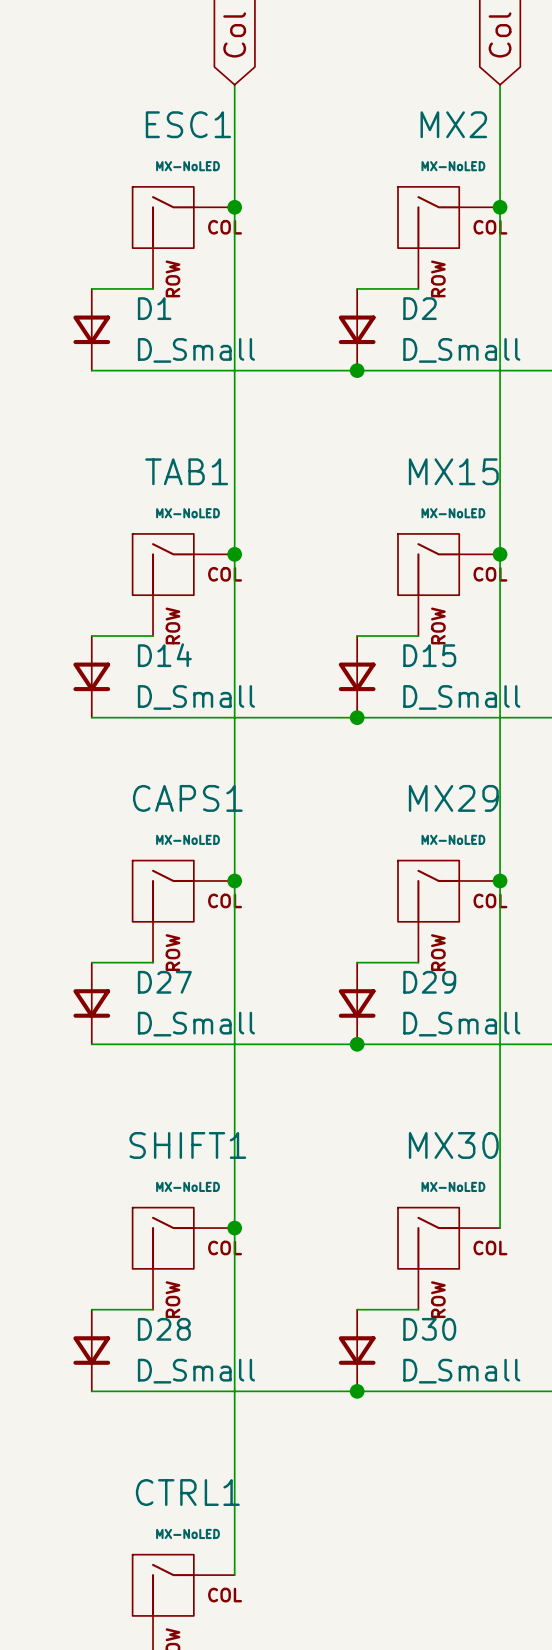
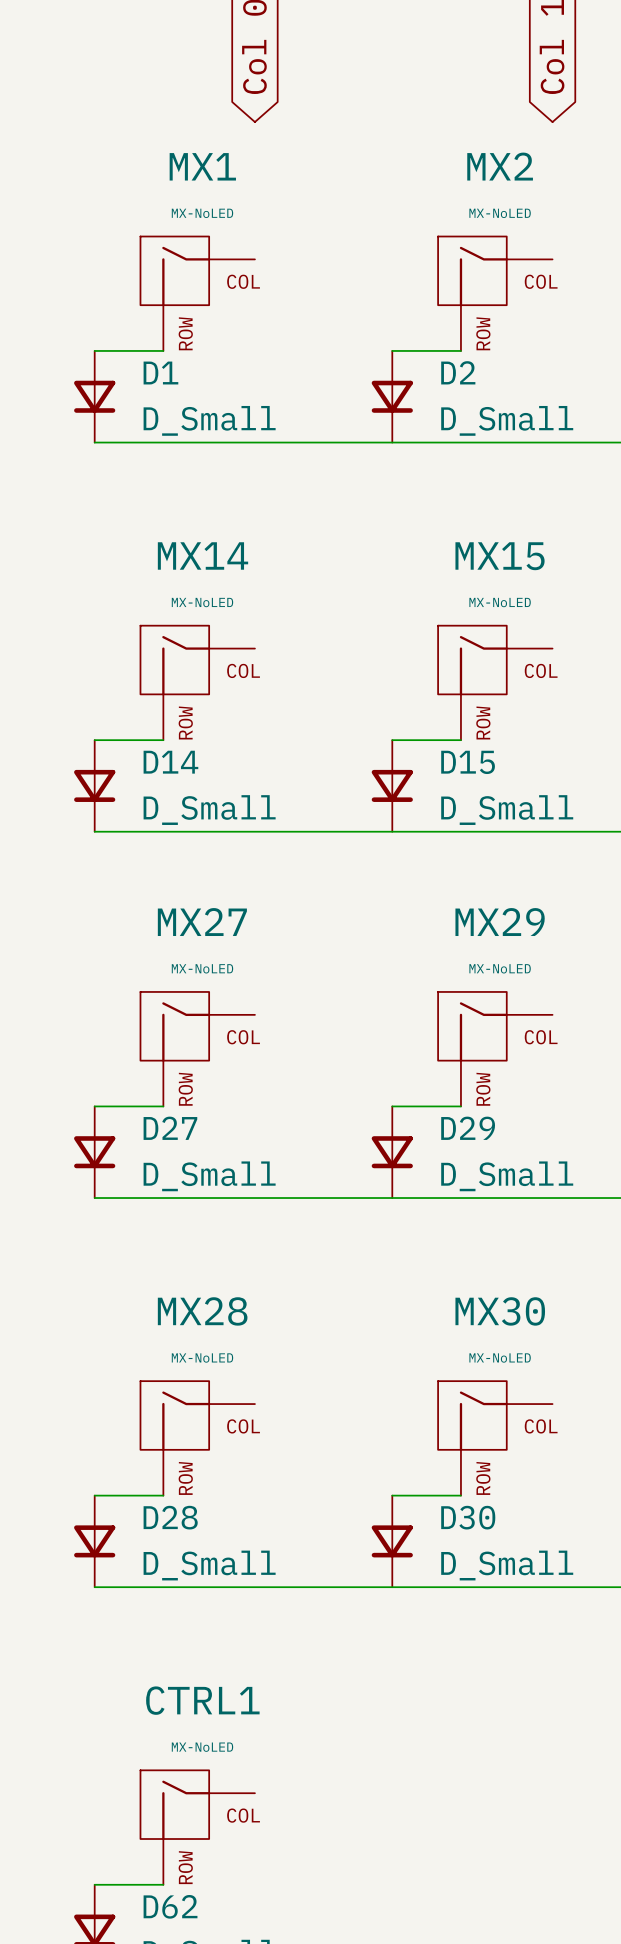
wire: (234, 84) (234, 1575) -> none
wire: (500, 84) (500, 1228) -> none
ESC1 name: ESC1 (188, 124) -> MX1 (202, 166)
junction: (234, 207) -> none
junction: (500, 207) -> none
junction: (357, 370) -> none
TAB1 name: TAB1 (186, 471) -> MX14 (202, 555)
junction: (234, 554) -> none
junction: (500, 554) -> none
junction: (357, 717) -> none
CAPS1 name: CAPS1 (187, 798) -> MX27 (202, 922)
junction: (234, 880) -> none
junction: (500, 880) -> none
junction: (357, 1044) -> none
SHIFT1 name: SHIFT1 (187, 1145) -> MX28 (202, 1311)
junction: (234, 1228) -> none
junction: (357, 1391) -> none

